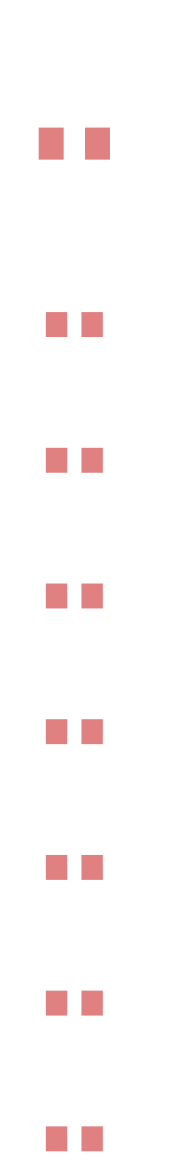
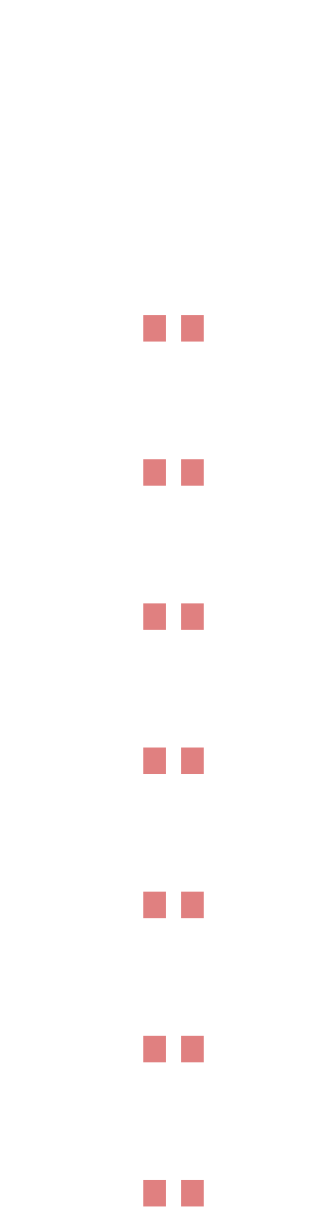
part: (74, 143) -> none

